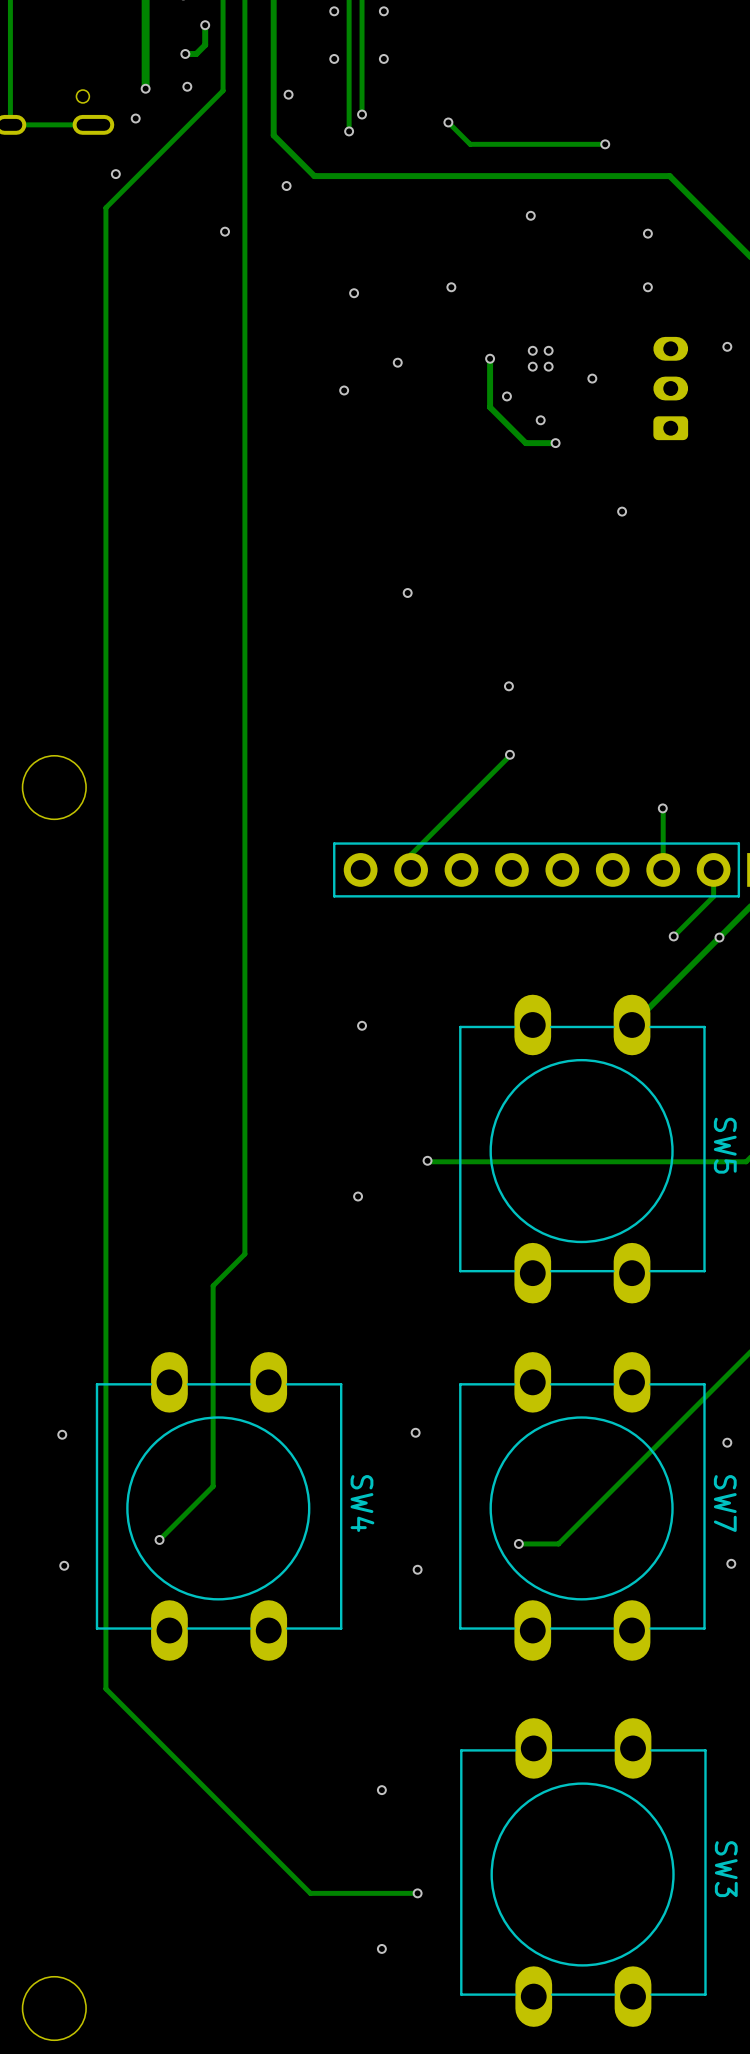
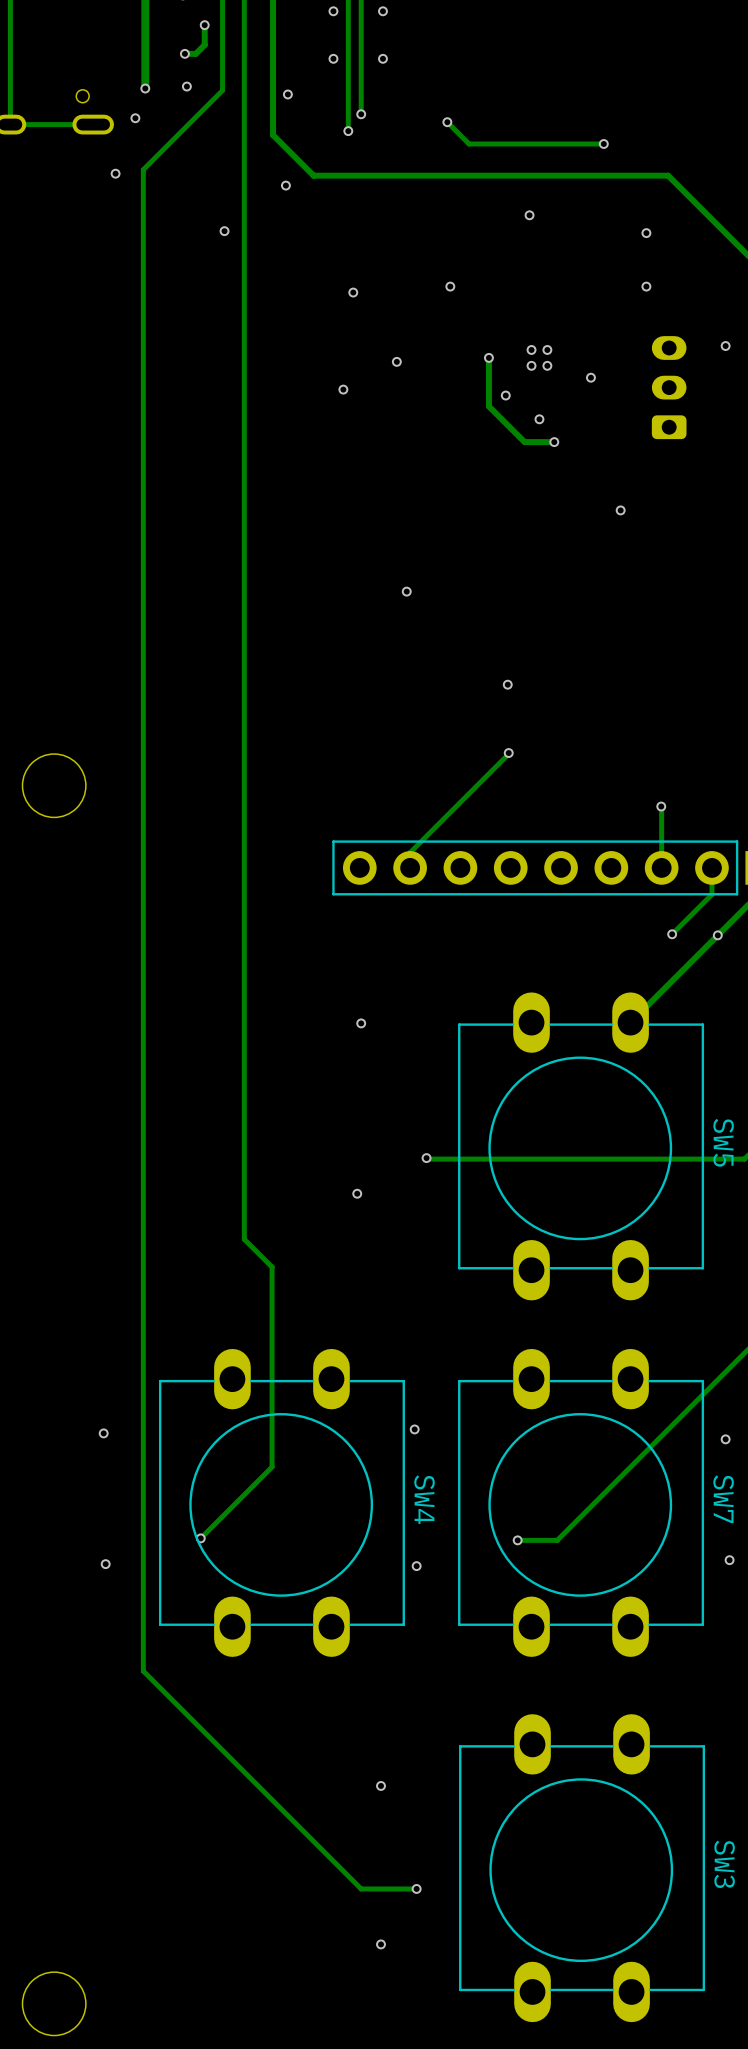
track: (143, 170) (105, 207) (105, 1688) (310, 1893) (362, 1893) -> (143, 169) (143, 1671) (361, 1888)
track: (244, 1242) (244, 1254) (213, 1285) (213, 1486) (159, 1539) -> (244, 1239) (272, 1267) (272, 1467) (200, 1538)
via position: (62, 1434) -> (103, 1433)
SW4 position: (219, 1506) -> (281, 1502)
via: (159, 1539) -> none
via: none -> (200, 1538)
via: (64, 1565) -> none
via: none -> (105, 1564)

